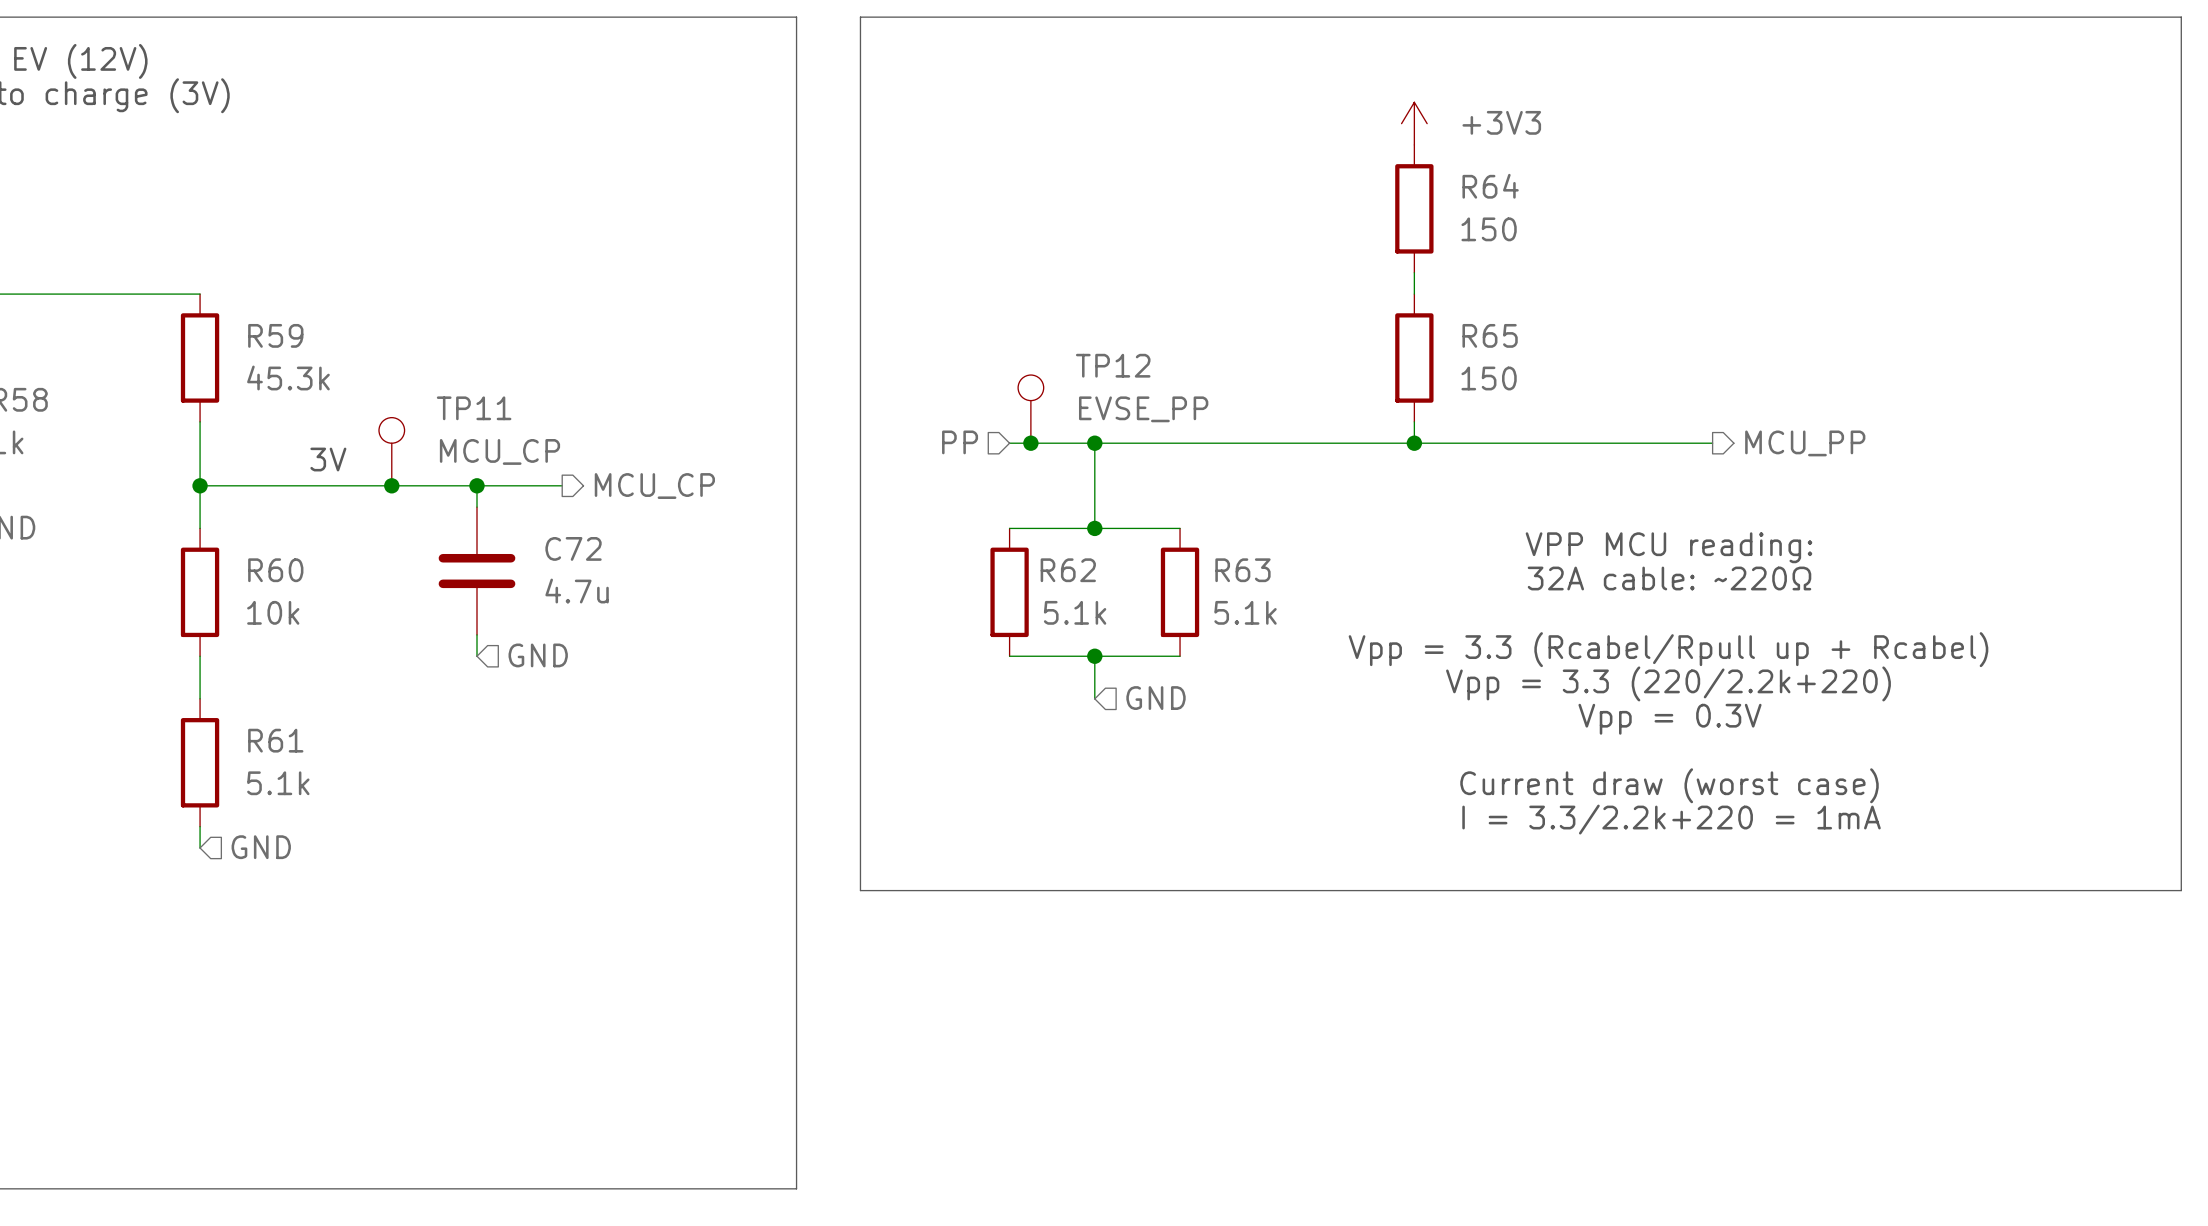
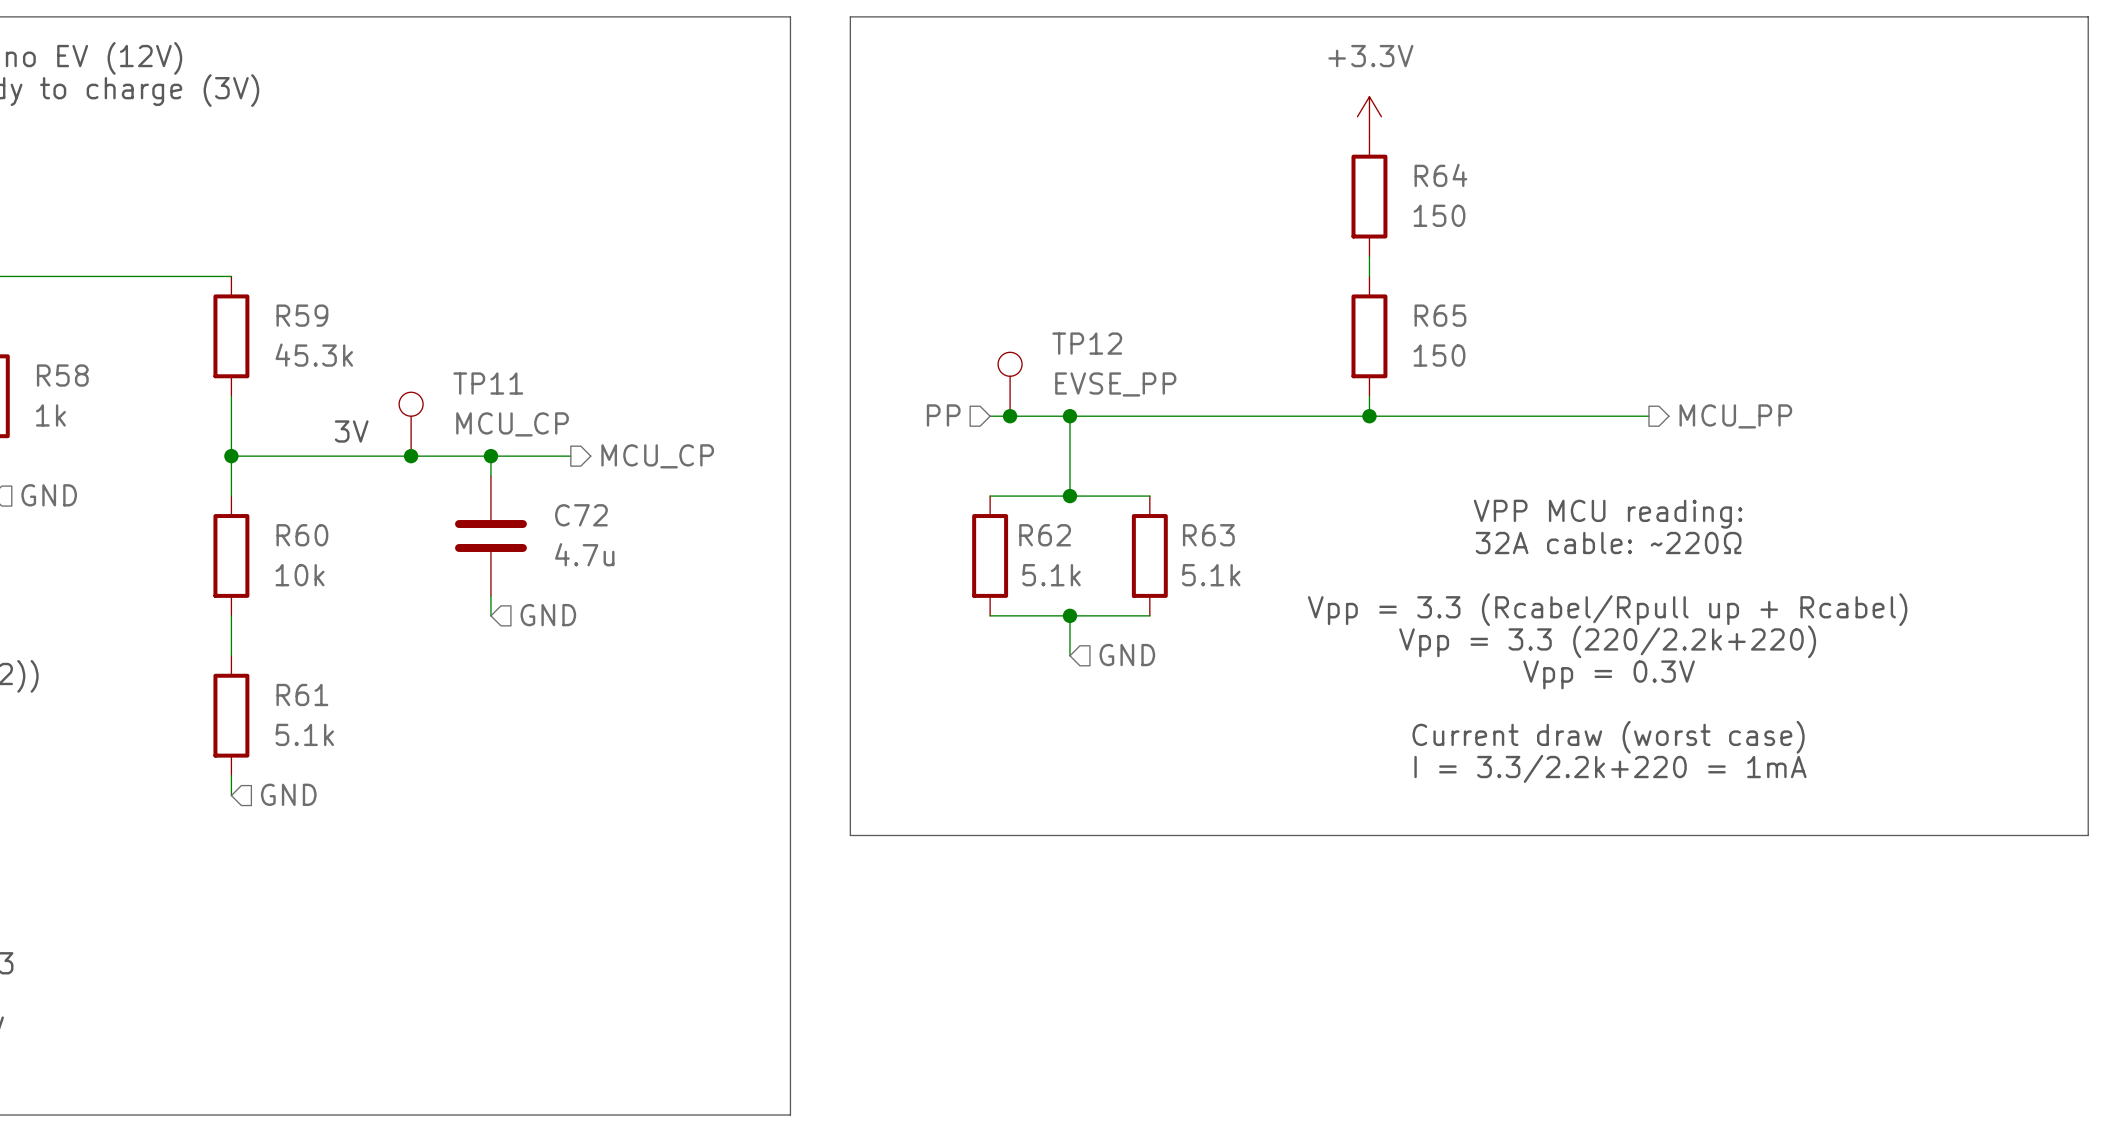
power symbol: +3V3 (1414, 123) -> +3.3V (1369, 116)

